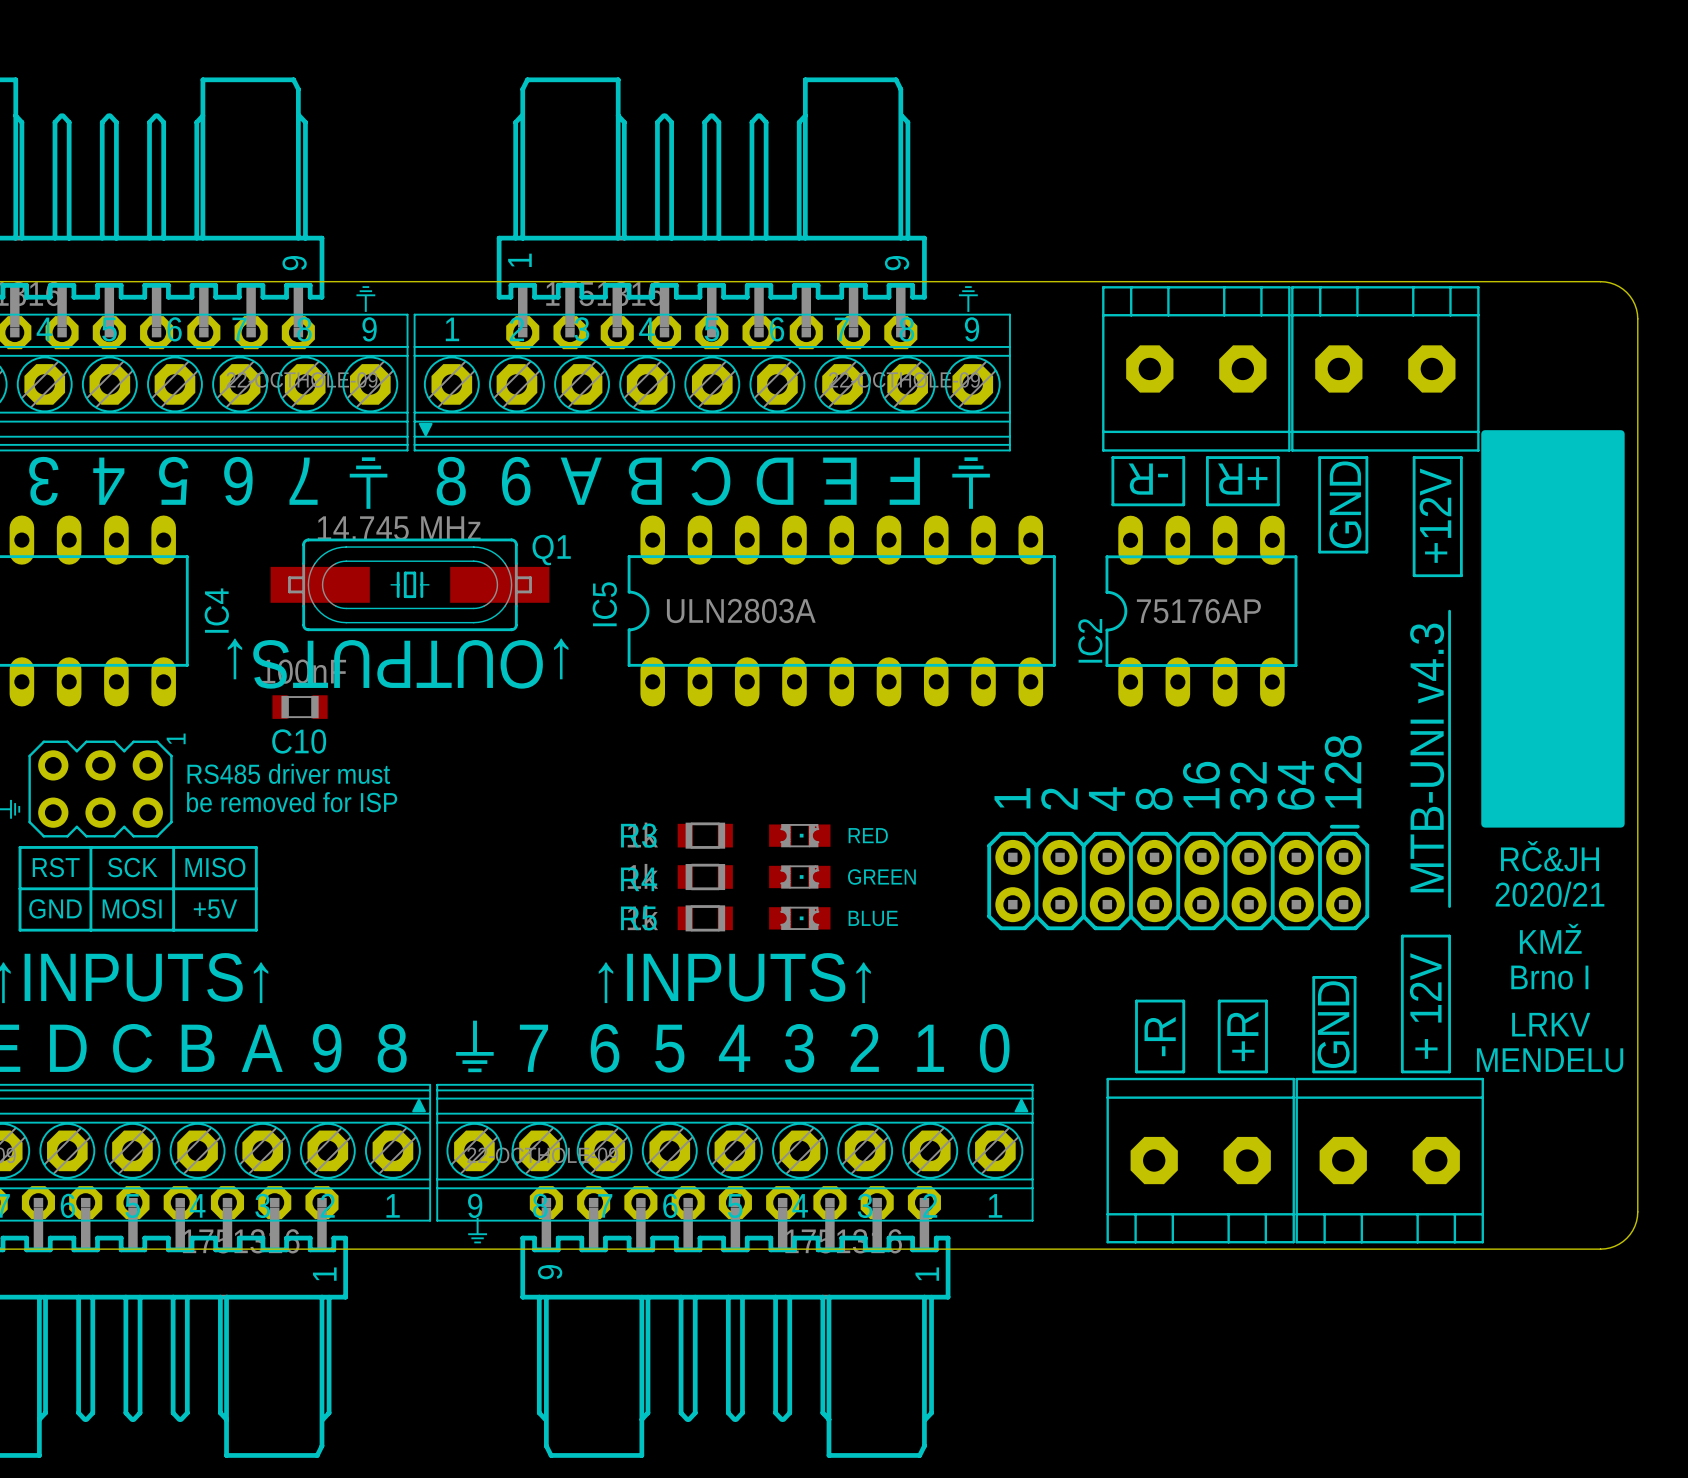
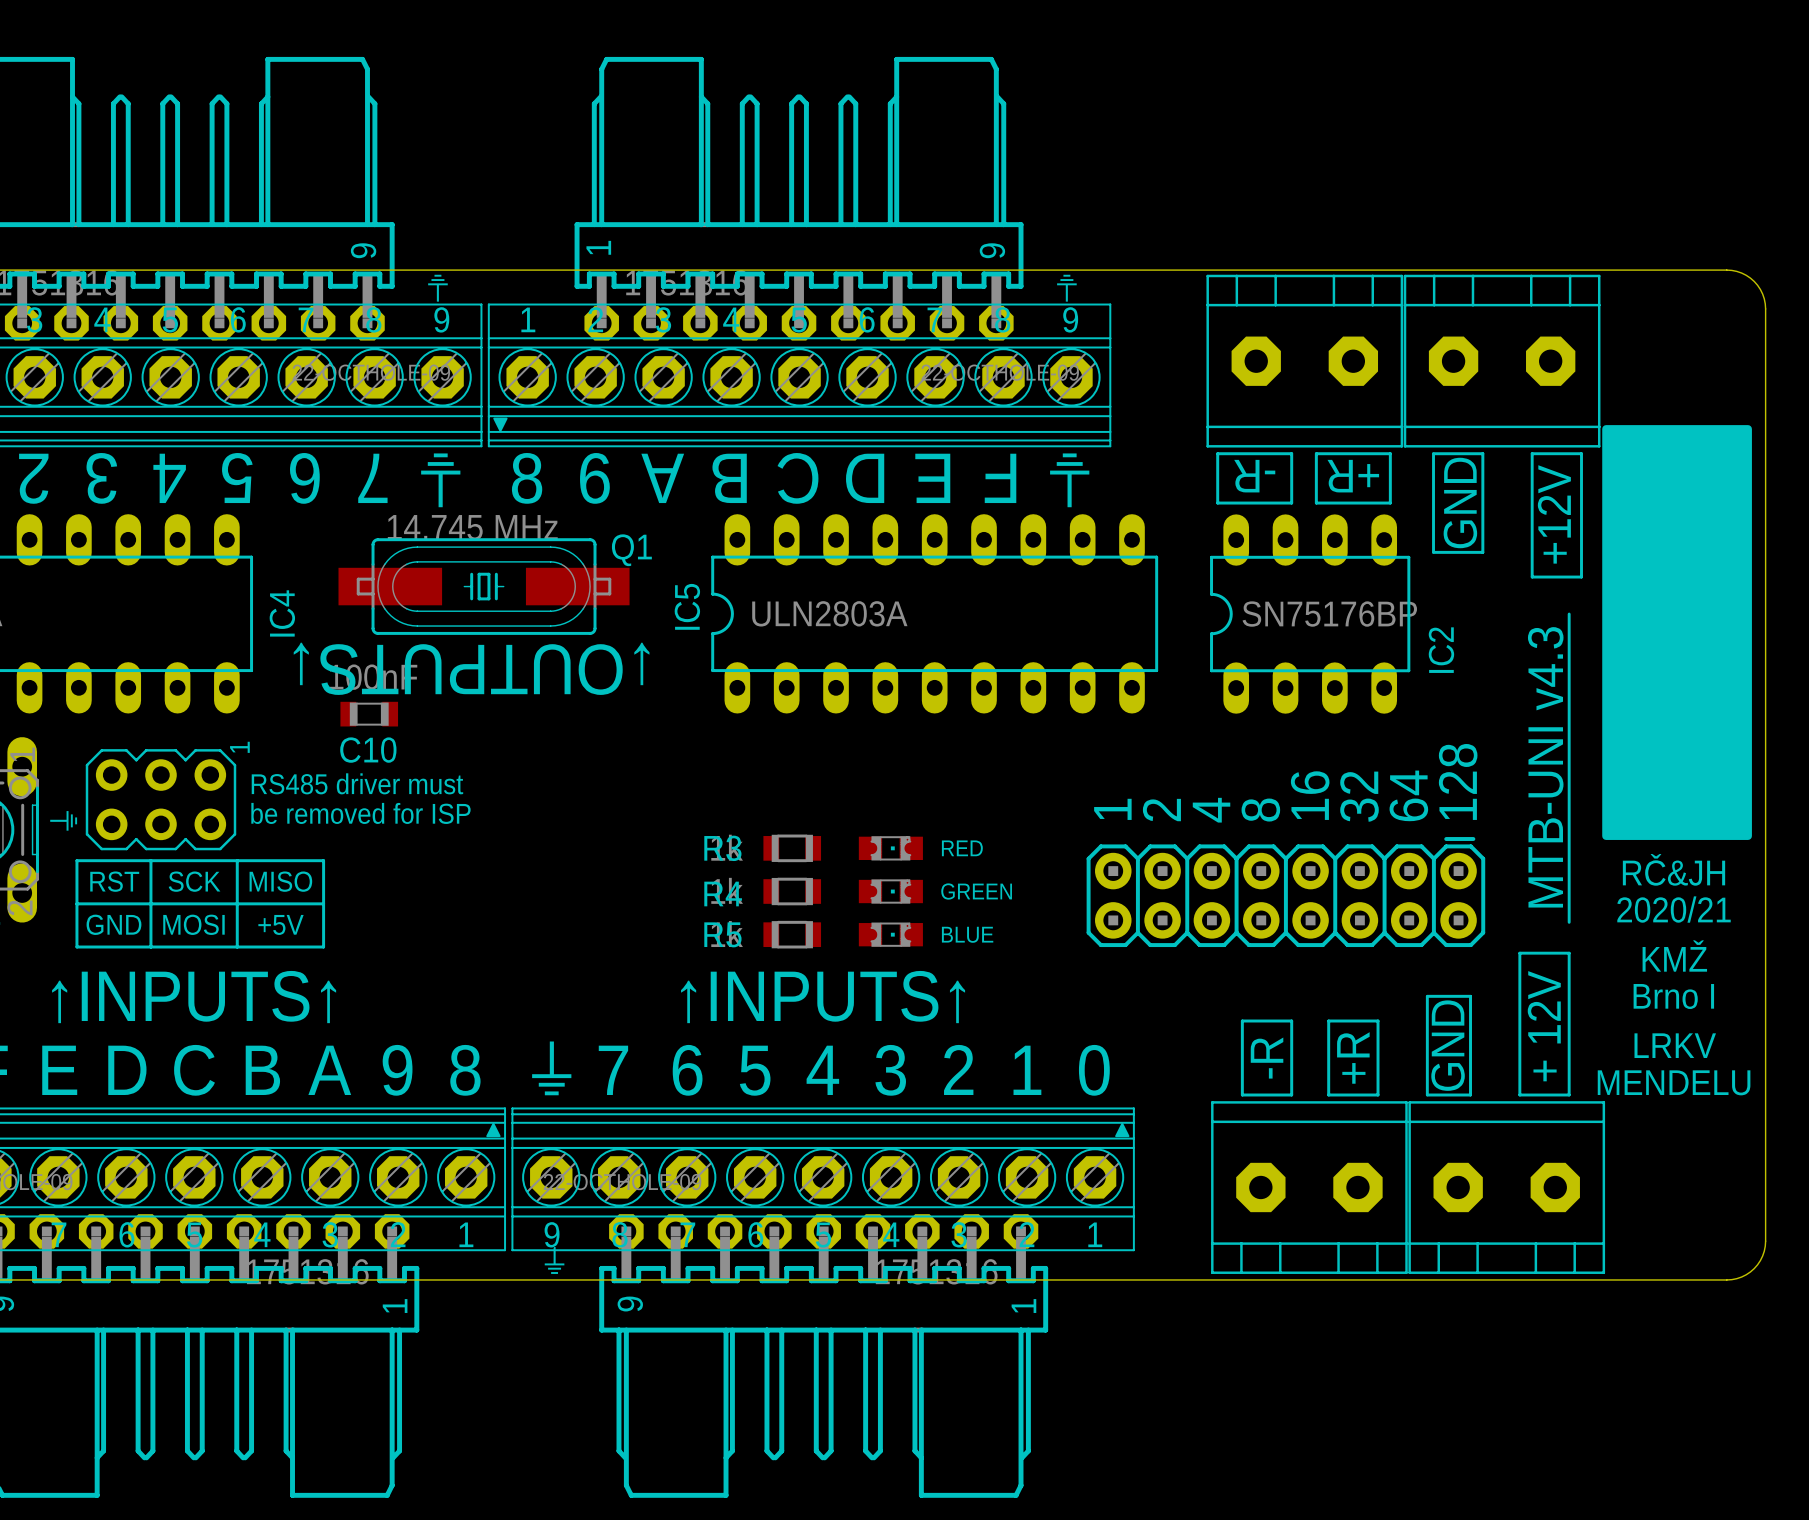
IC2 value: 75176AP (1198, 611) -> SN75176BP (1329, 614)
IC2 name position: IC2 (1090, 640) -> IC2 (1441, 650)

